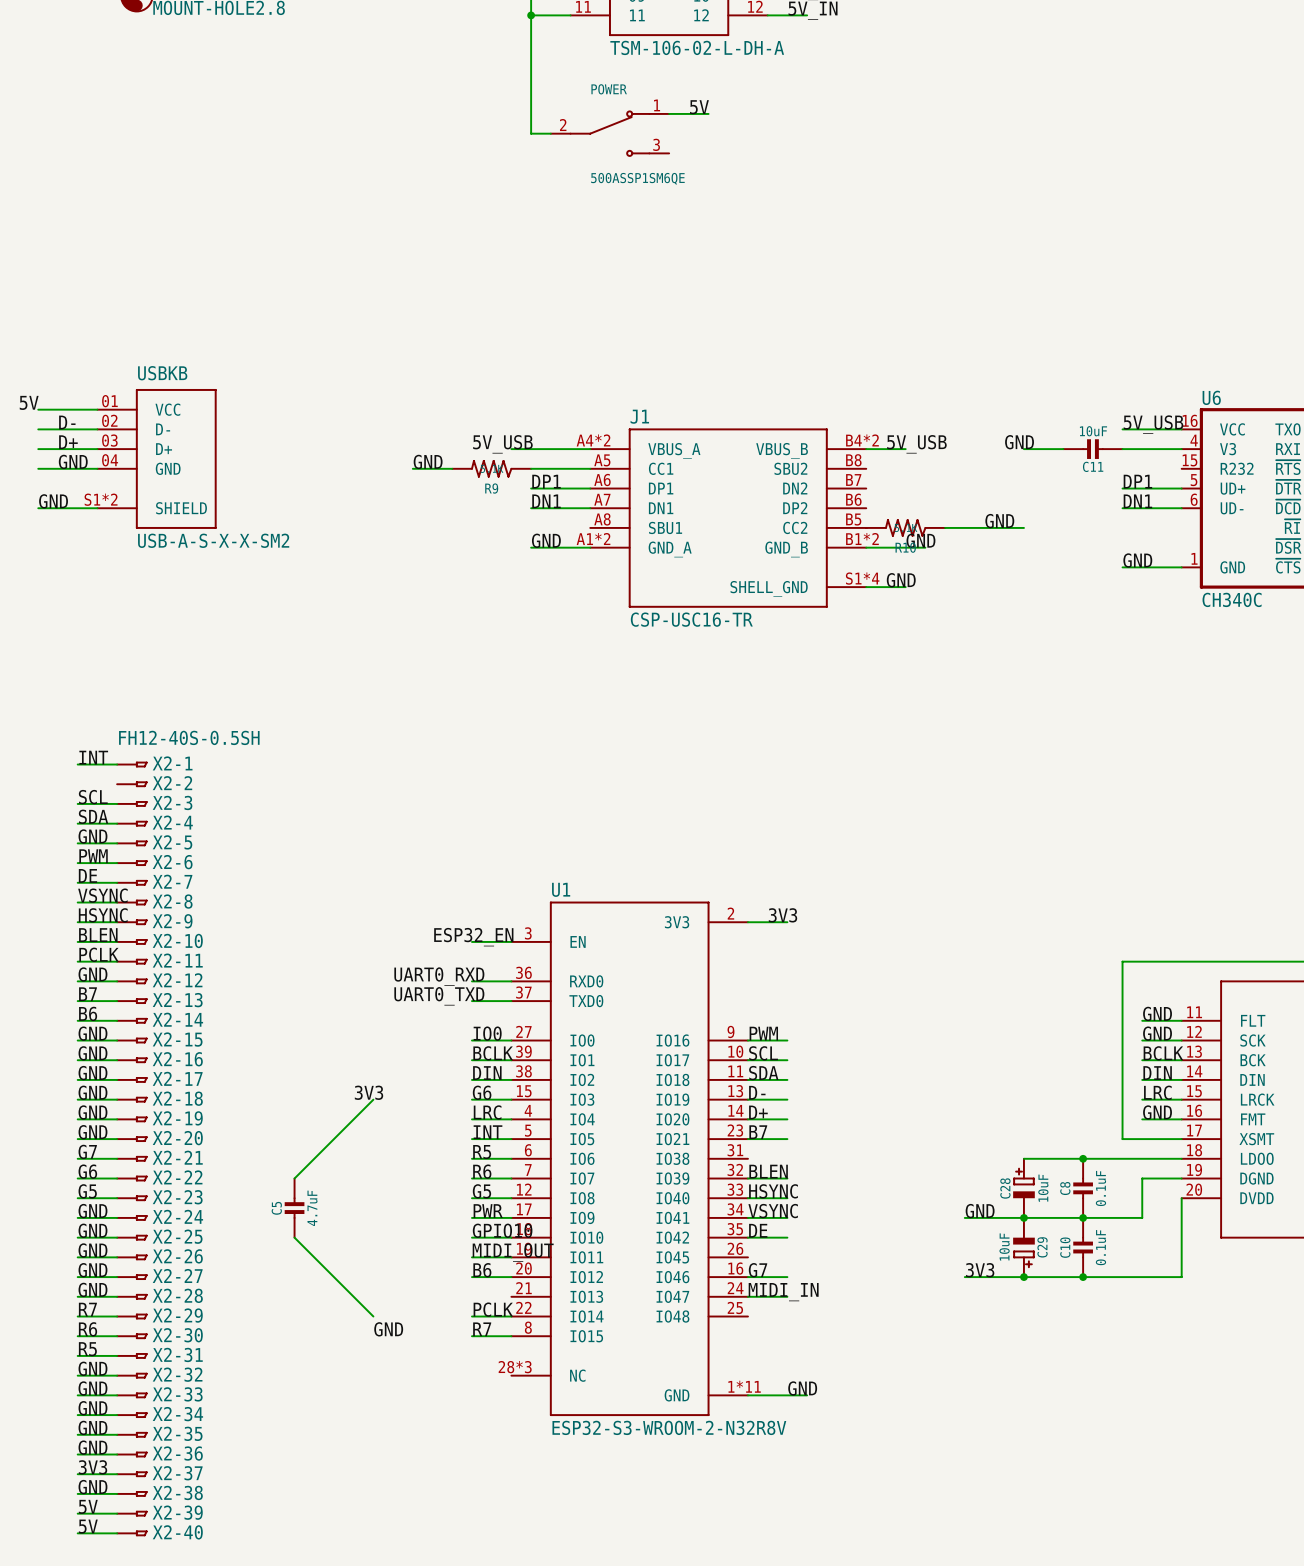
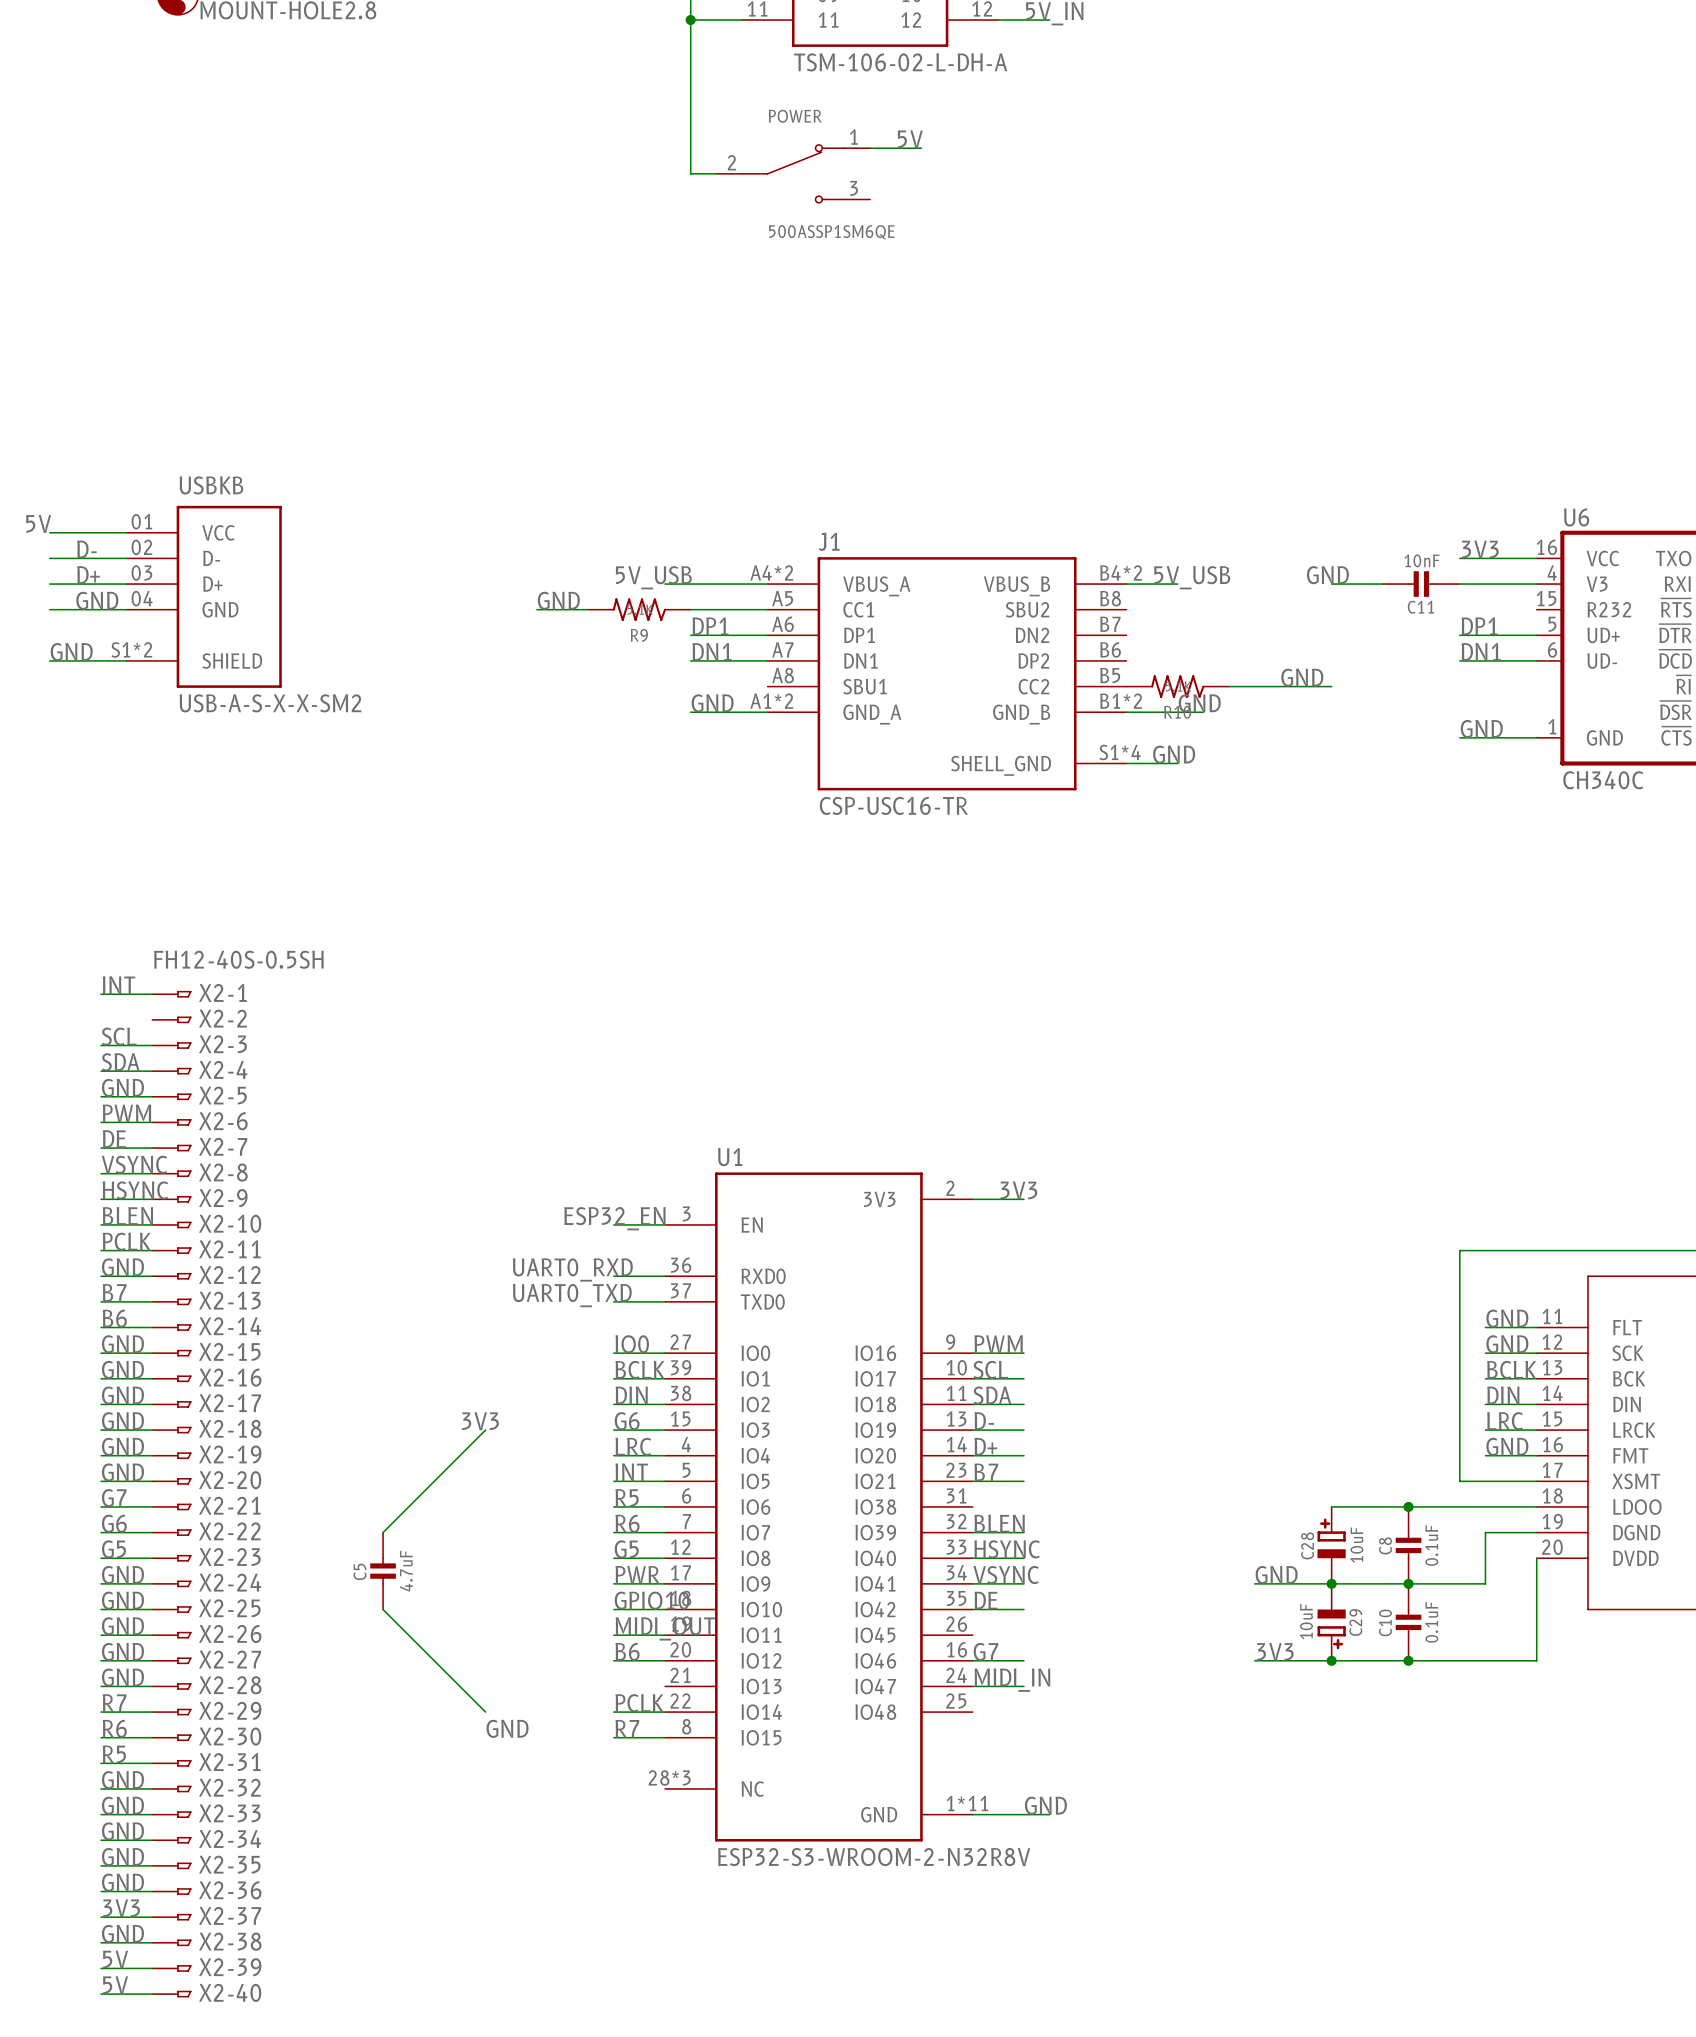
label: 5V_USB (1153, 424) -> 3V3 (1480, 549)
C11 value: 10uF (1093, 431) -> 10nF (1422, 560)

